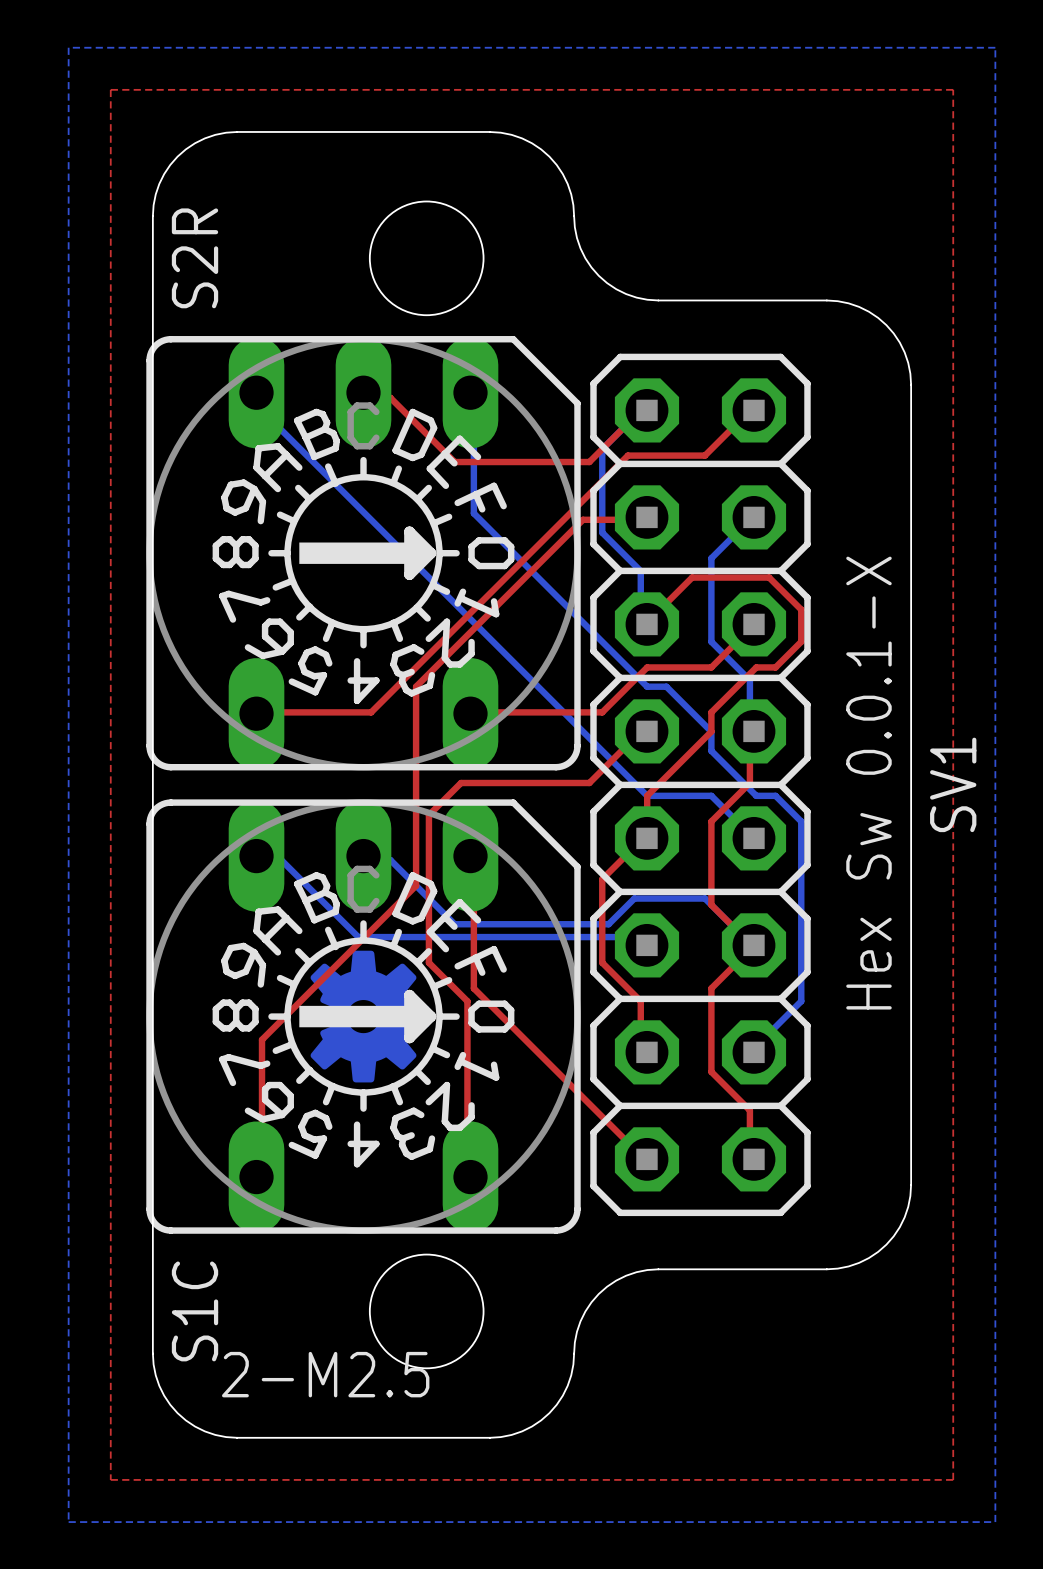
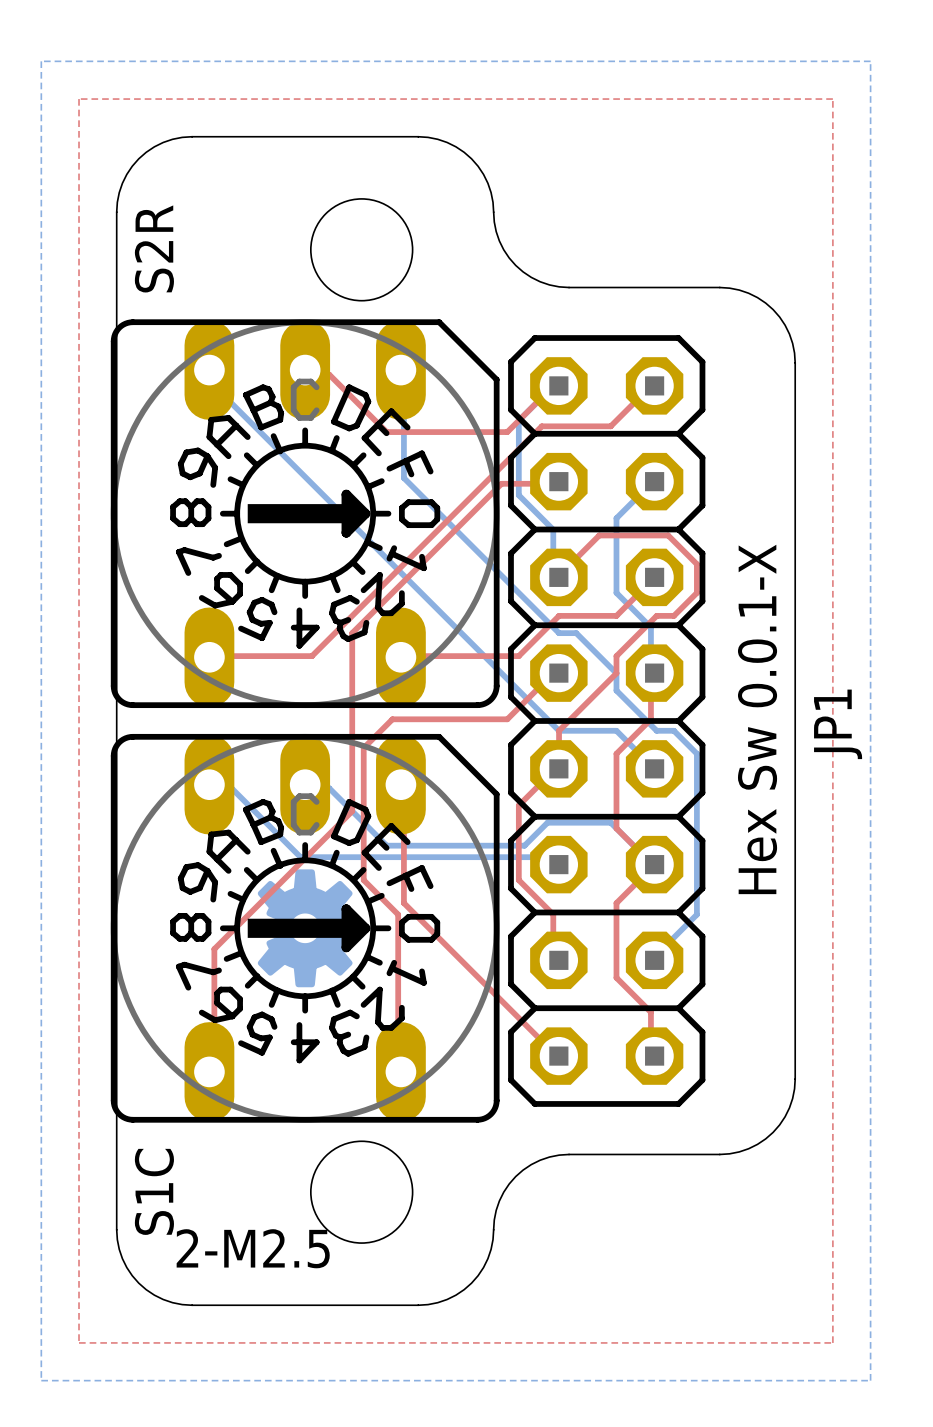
SV1 name: SV1 (953, 784) -> JP1 (838, 724)

